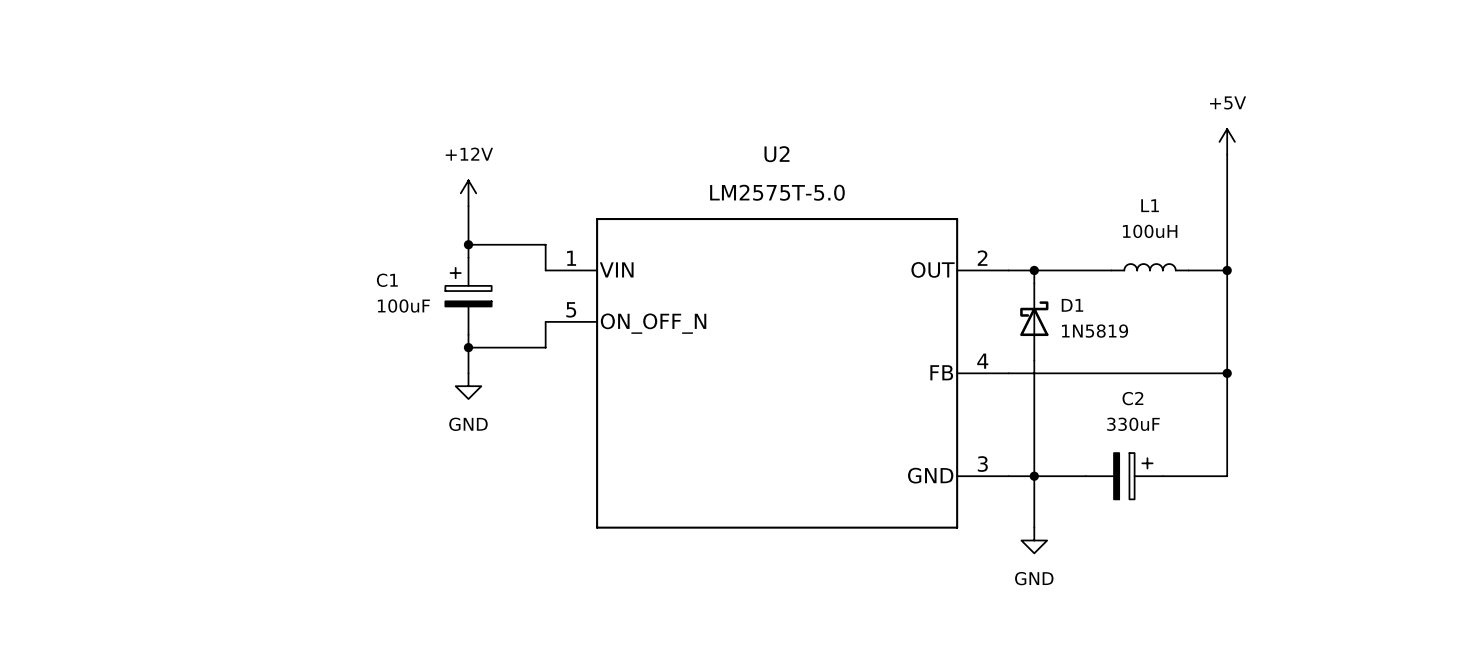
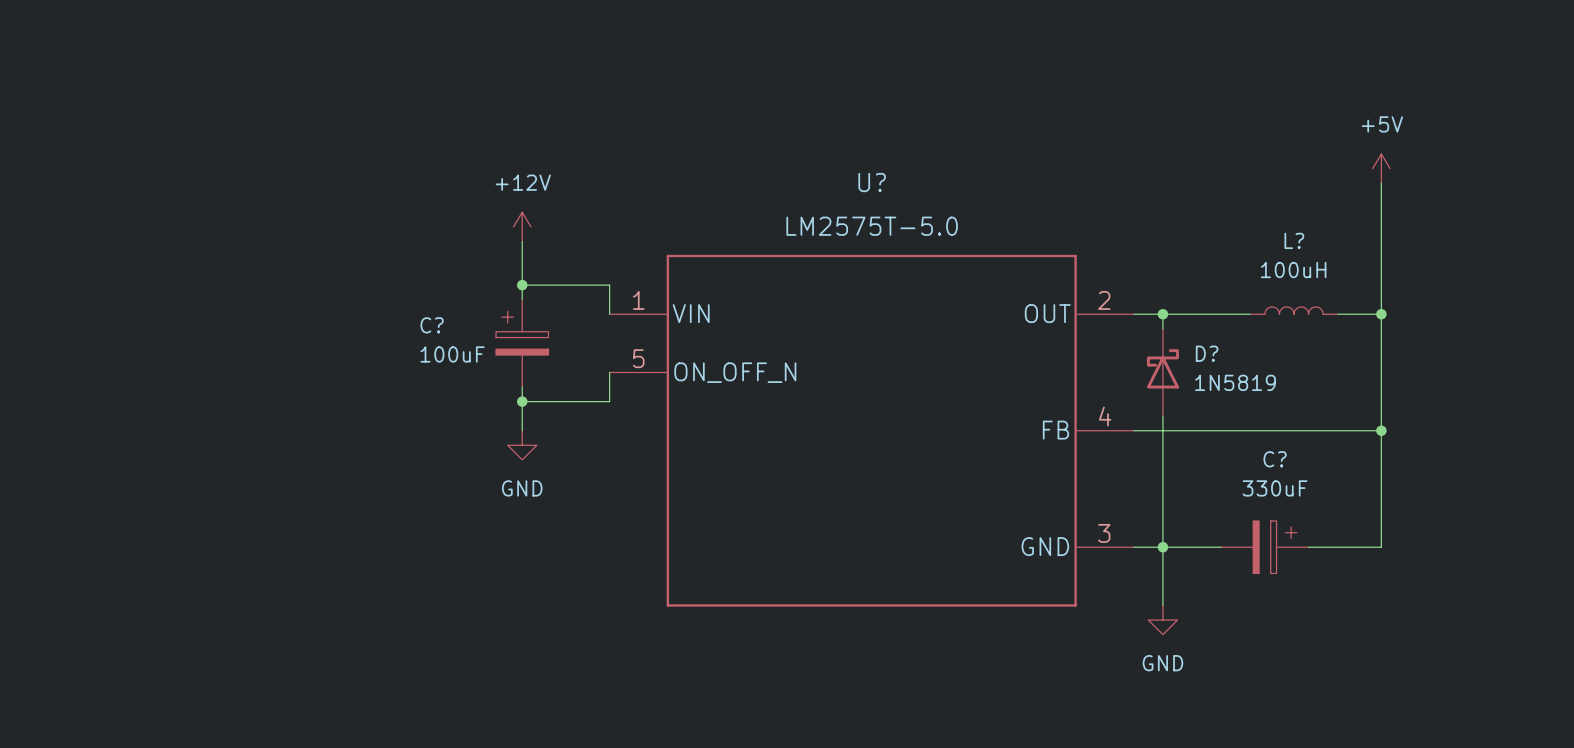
U2 name: U2 (776, 154) -> U? (872, 182)
L1 name: L1 (1150, 205) -> L? (1294, 240)
C1 name: C1 (387, 280) -> C? (432, 325)
D1 name: D1 (1072, 305) -> D? (1207, 353)
C2 name: C2 (1132, 398) -> C? (1275, 459)

